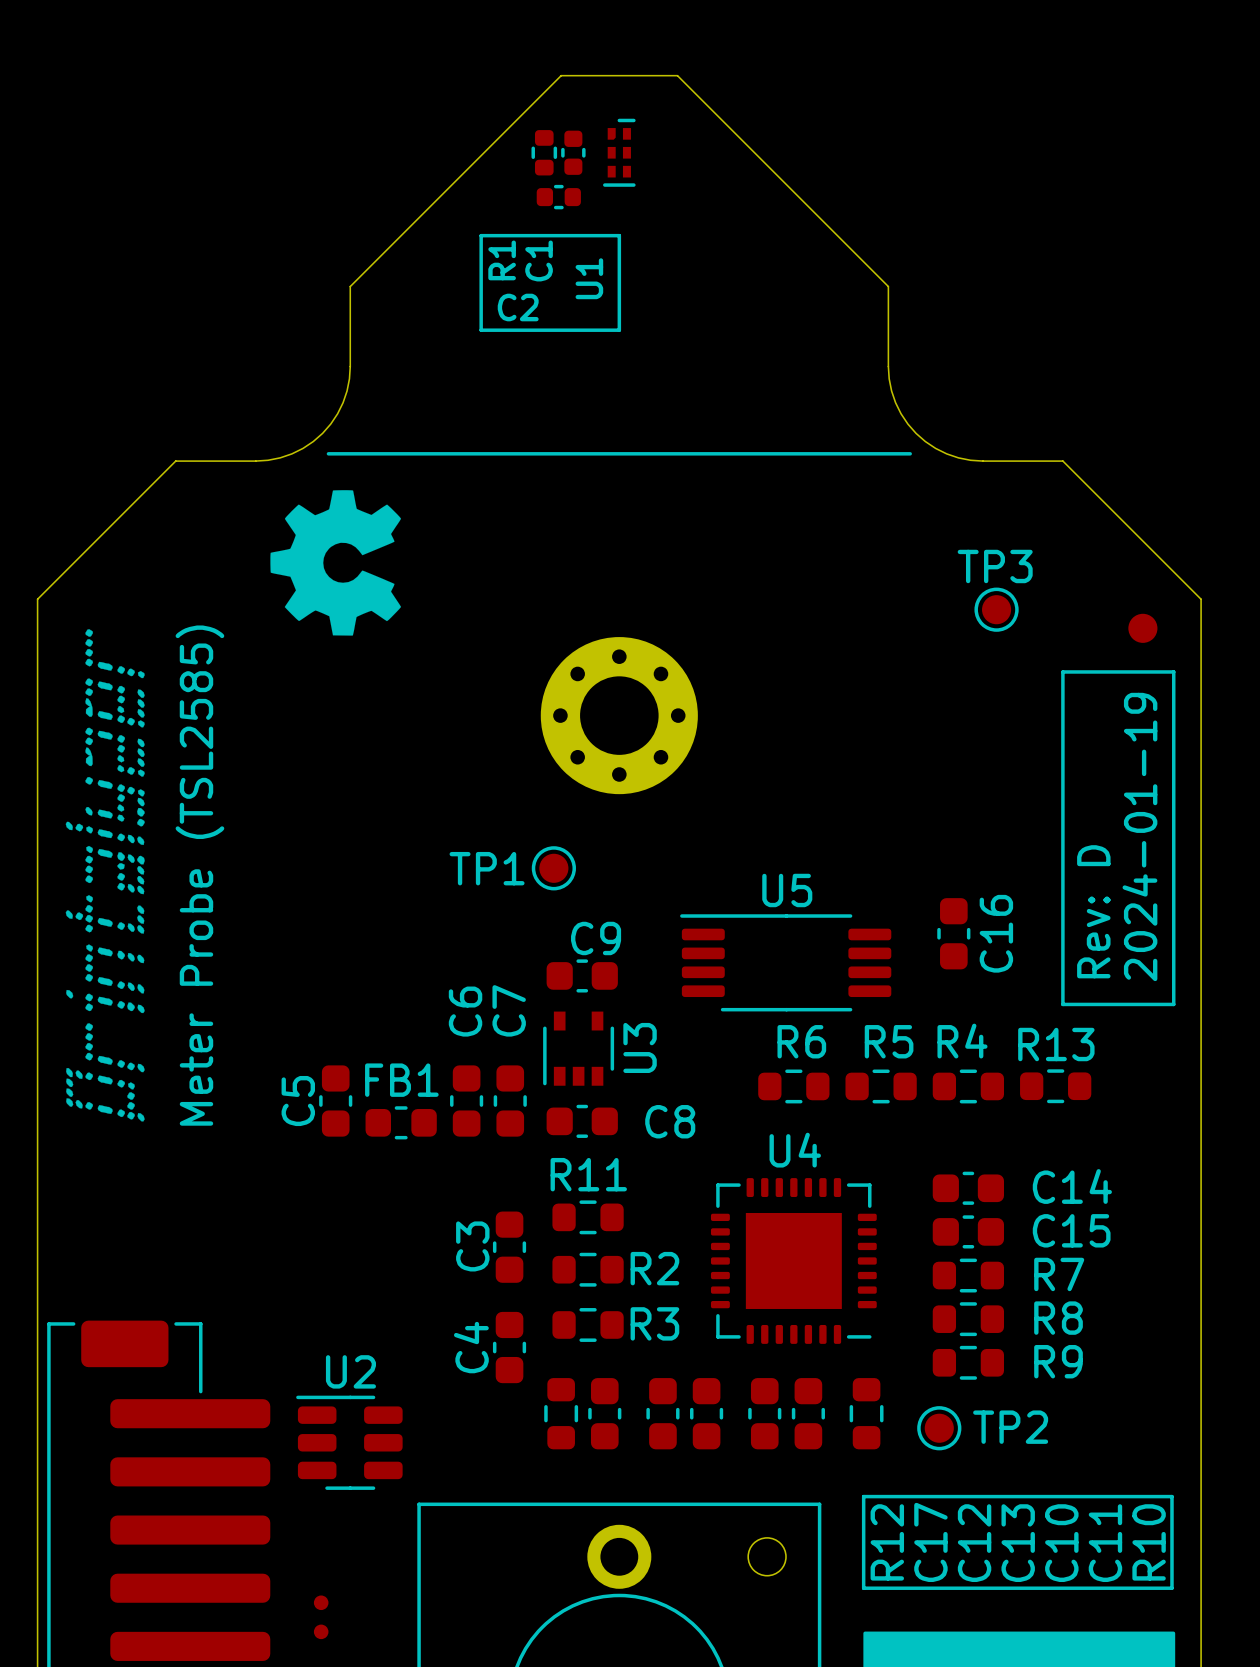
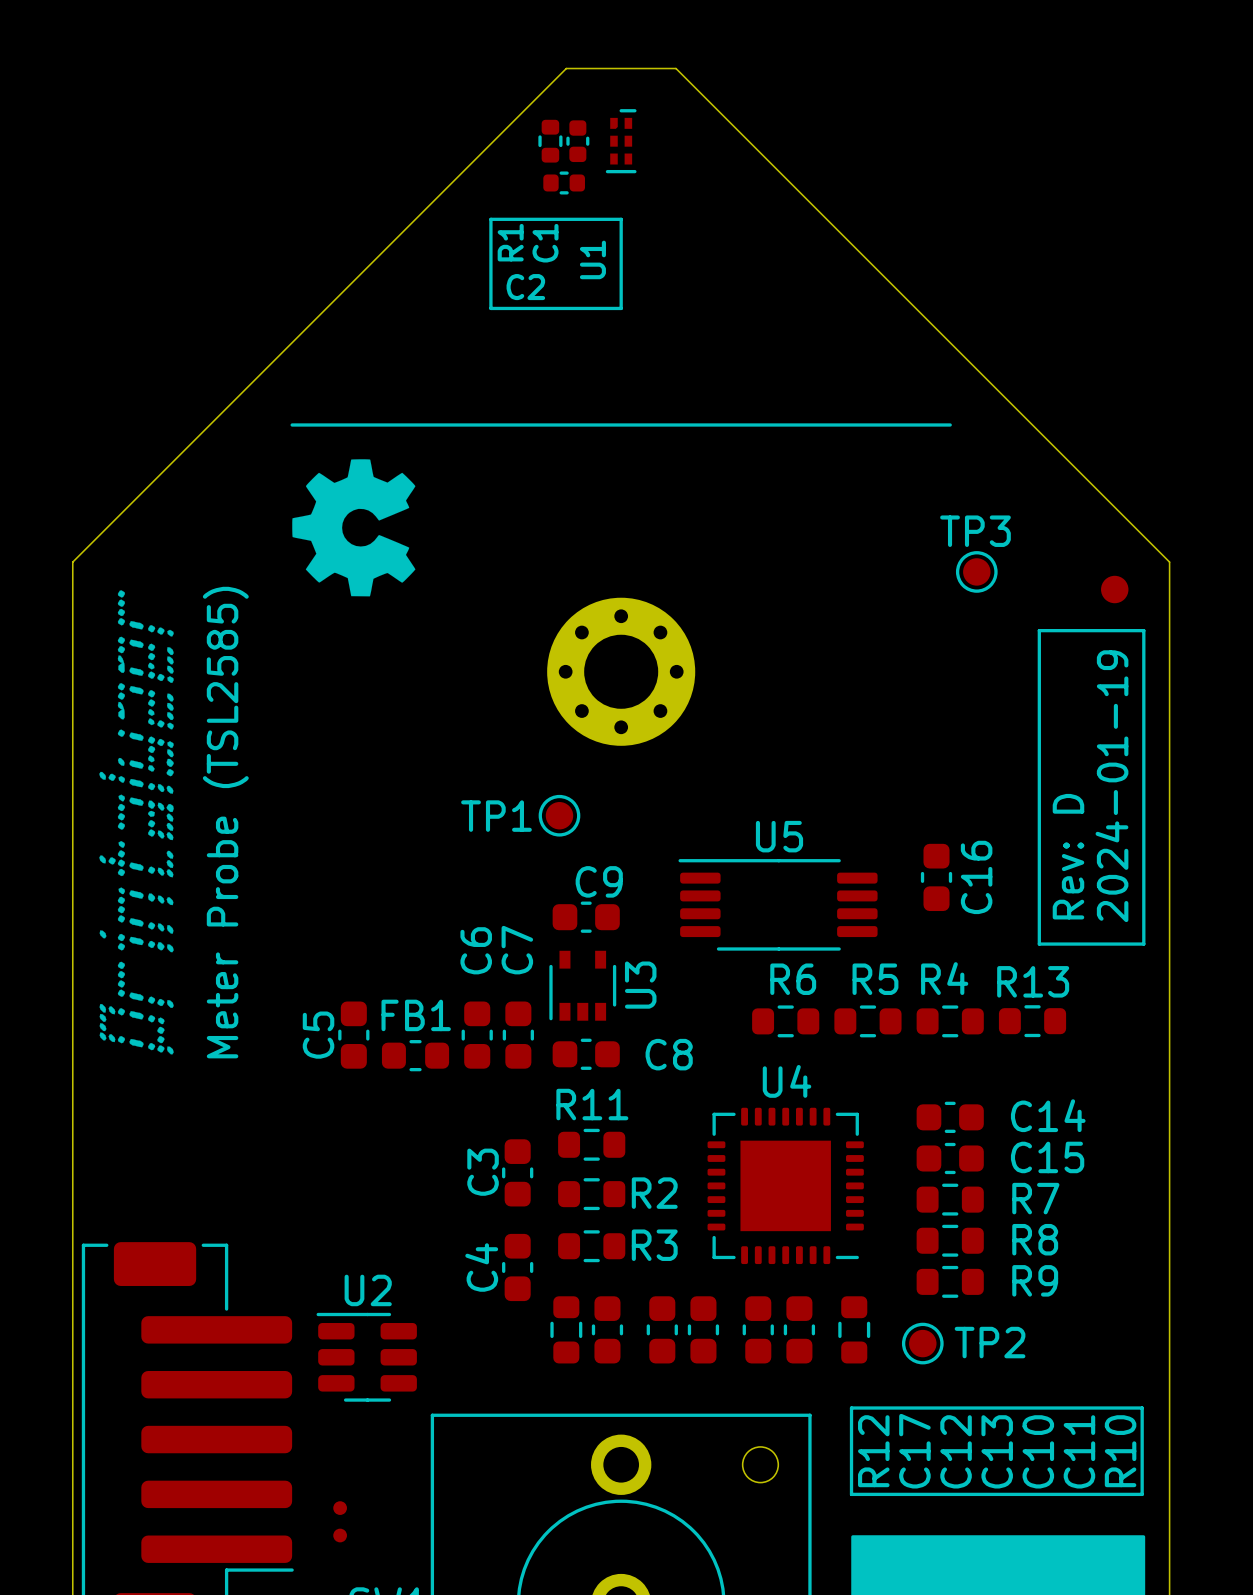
board edge: (350, 286) (349, 378) (343, 402) (337, 413) (322, 433) (303, 448) (291, 453) (268, 460) (175, 461) -> (367, 267) (203, 431)
board edge: (888, 286) (889, 378) (895, 402) (901, 413) (916, 433) (935, 448) (958, 457) (970, 460) (1062, 461) -> (874, 267) (1039, 431)
line: none -> (292, 424) (346, 424)
line: none -> (895, 424) (950, 424)

